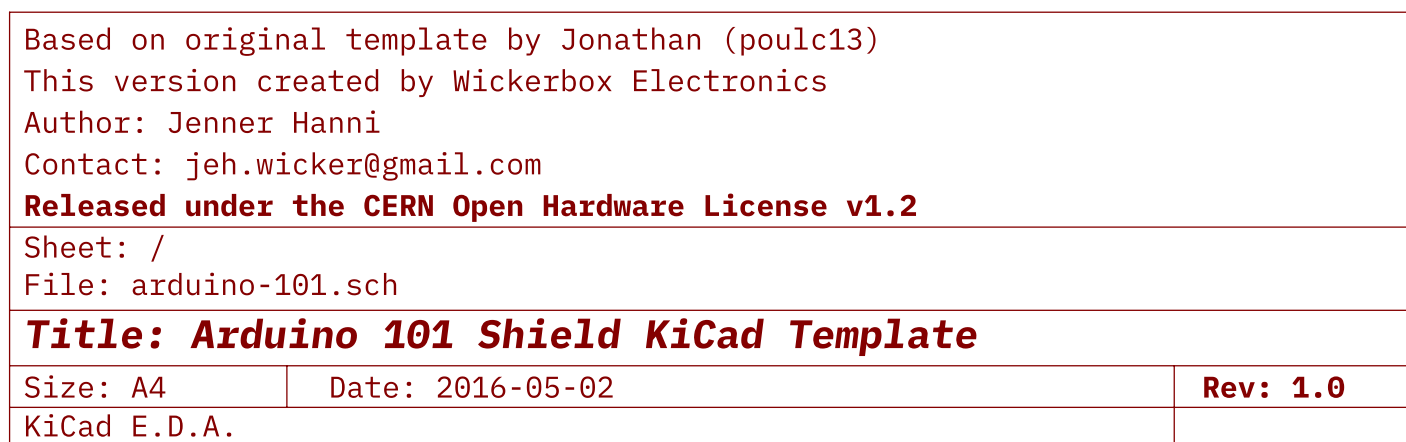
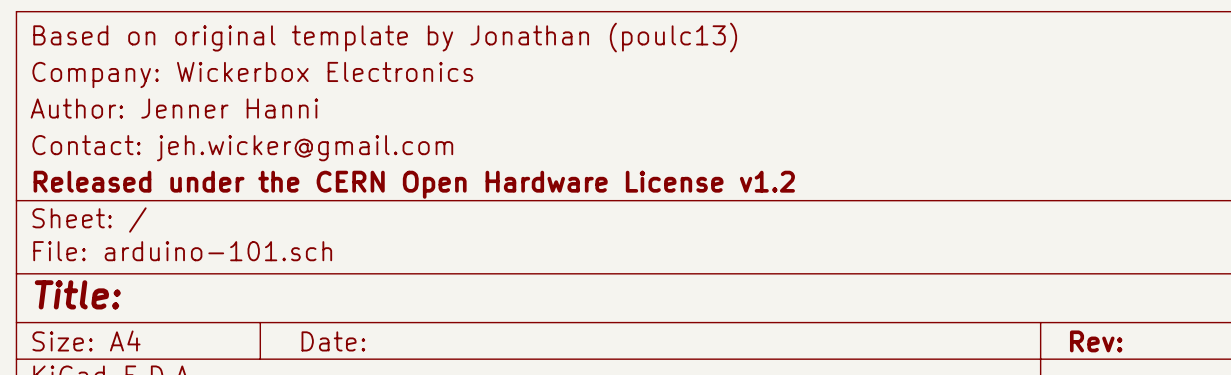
title block: This version created by Wickerbox Electronics (424, 82) -> Company: Wickerbox Electronics (252, 75)
title block: Title: Arduino 101 Shield KiCad Template (501, 337) -> Title: (77, 294)
title block: Date: 2016-05-02 (471, 387) -> Date: (333, 341)
title block: Rev: 1.0 (1274, 387) -> Rev: (1096, 341)

